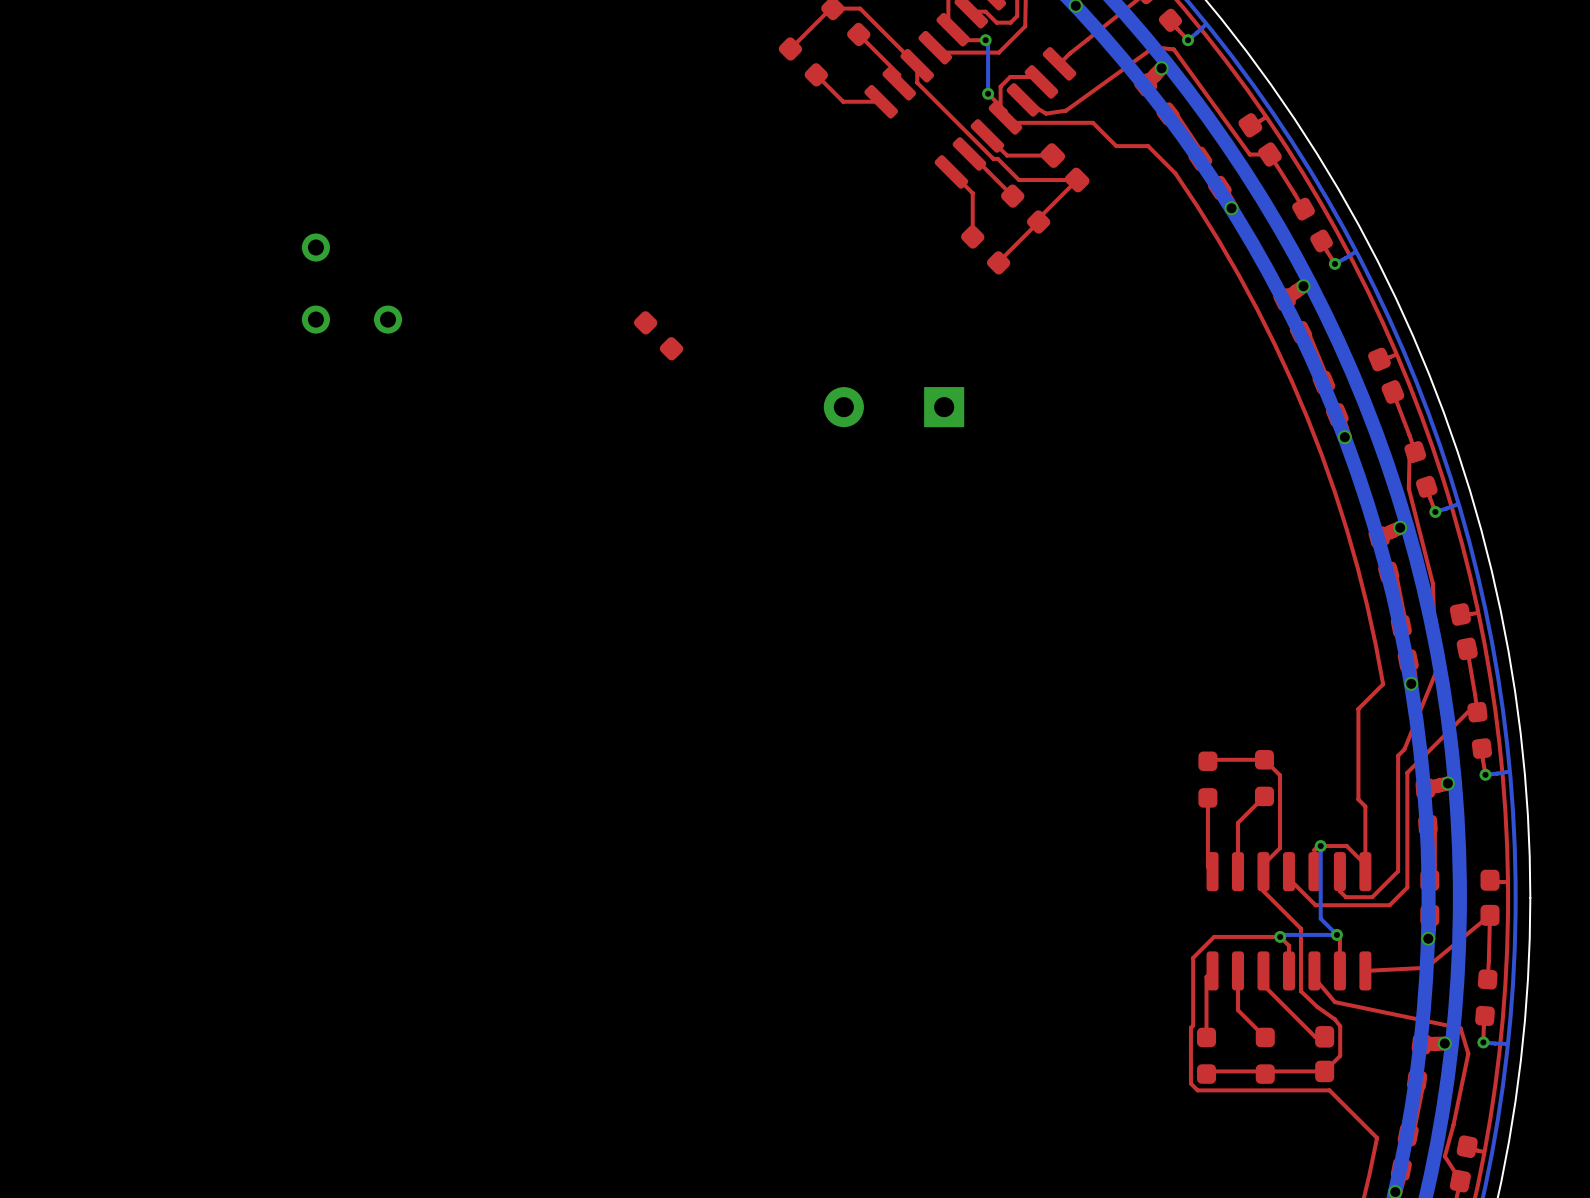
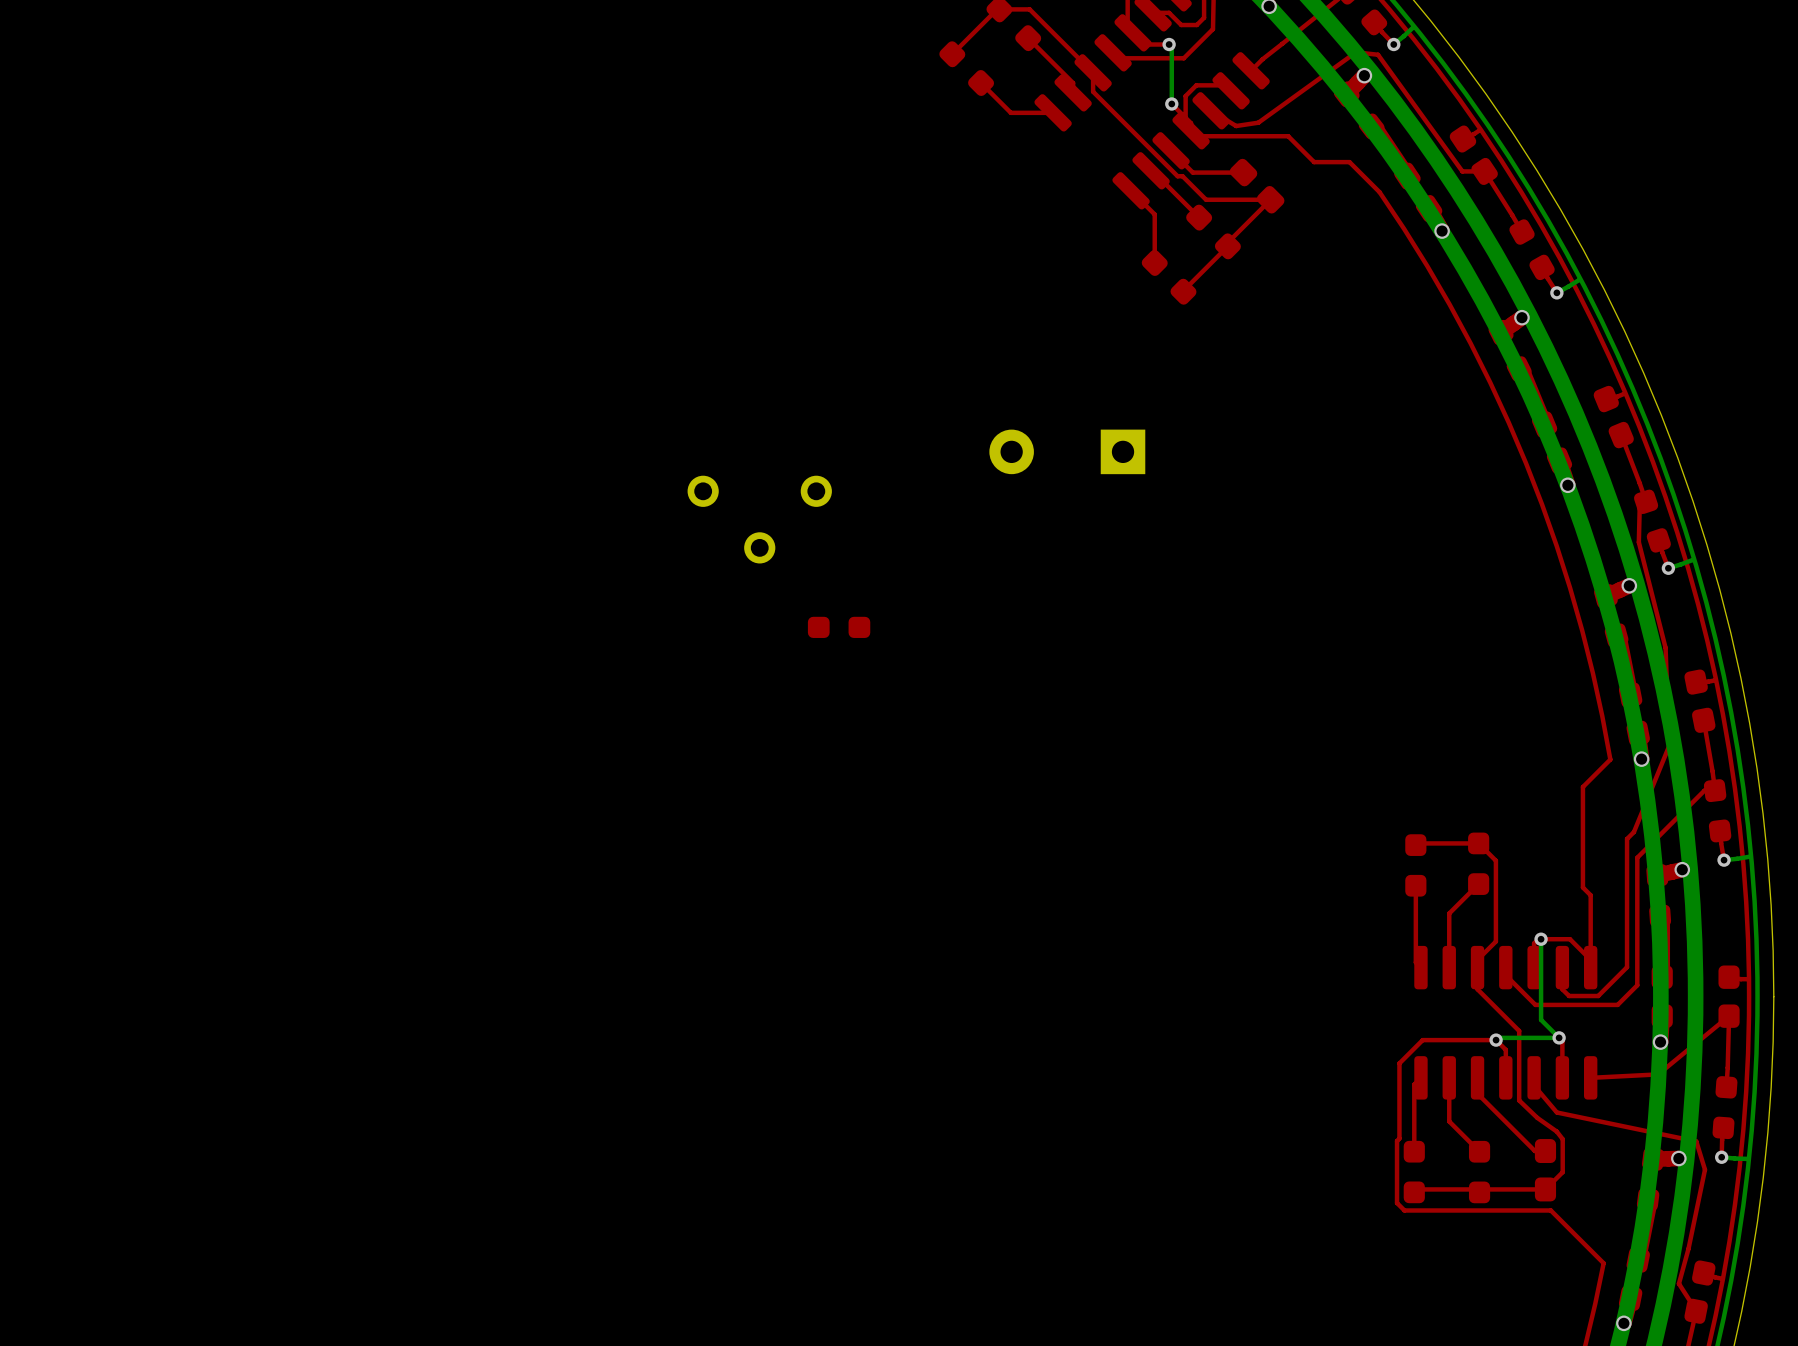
part: (351, 283) -> none
part: (658, 335) -> none
part: none -> (759, 519)
part: none -> (839, 627)

